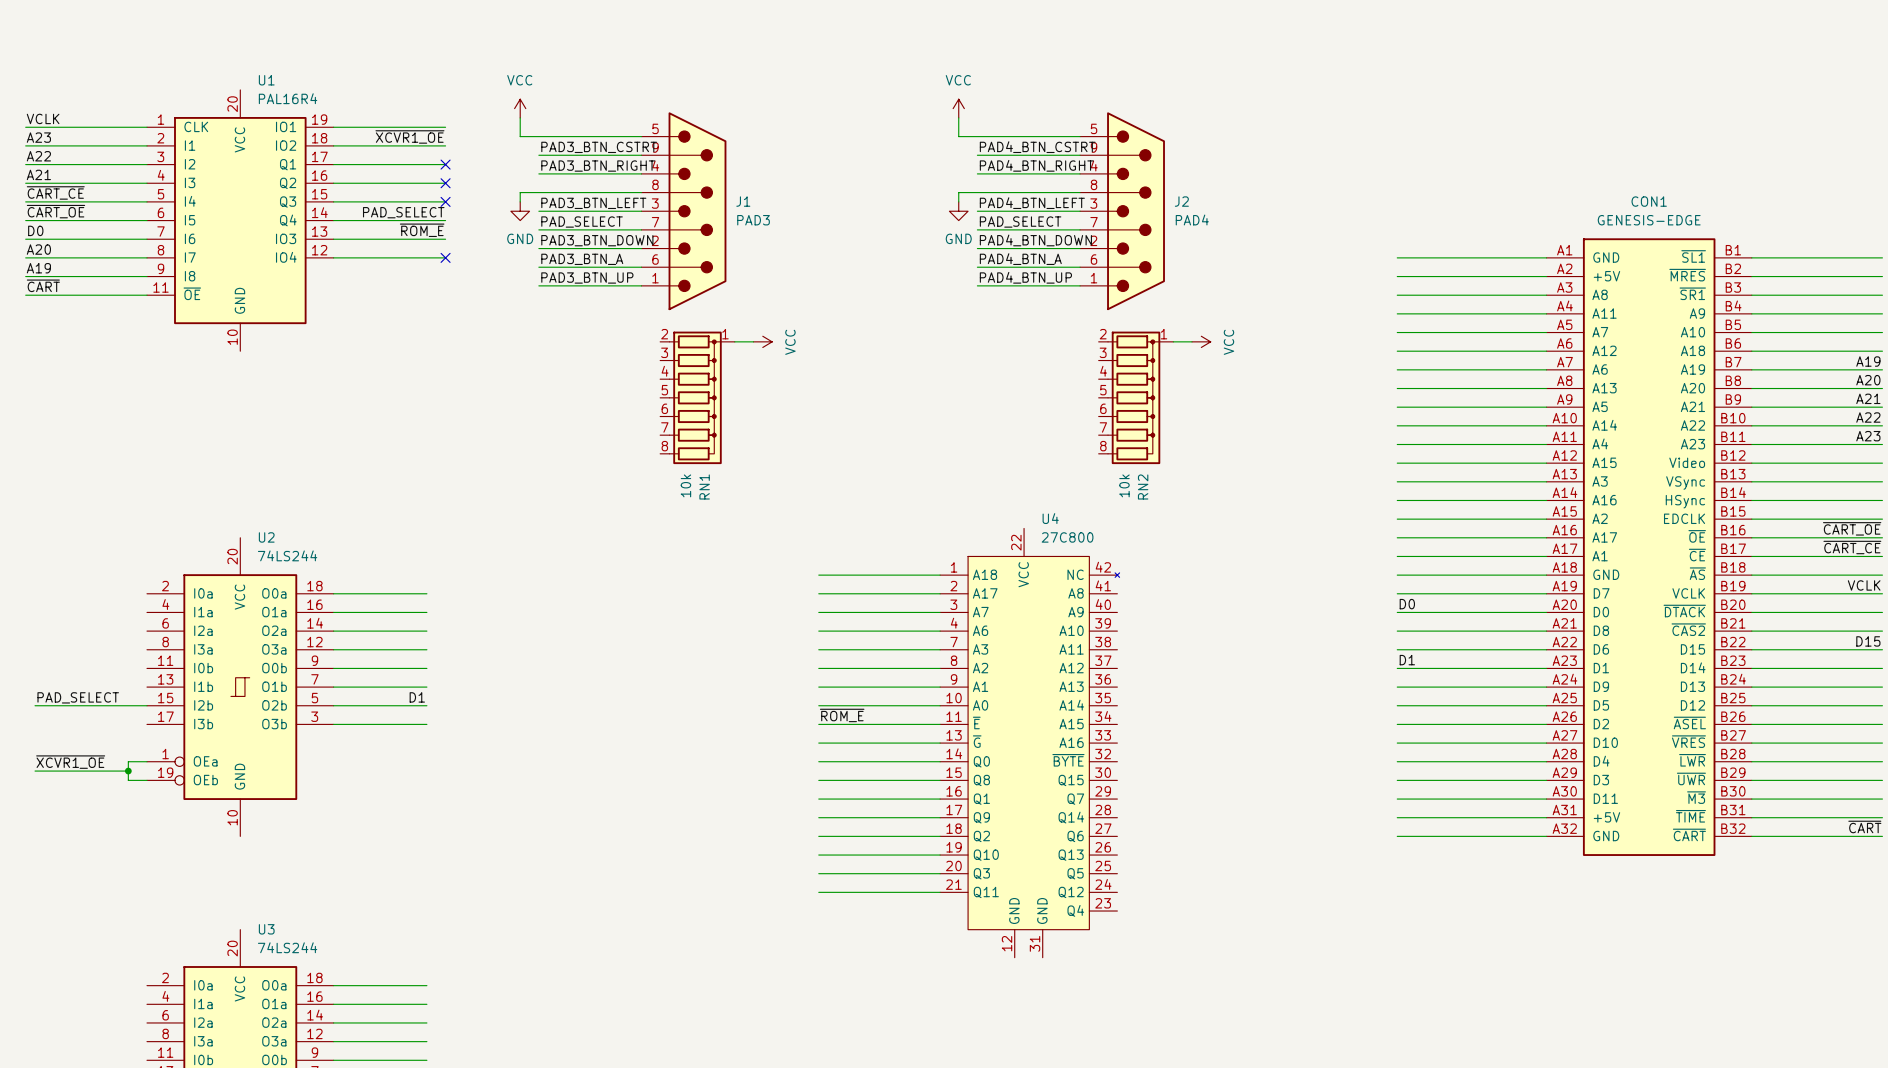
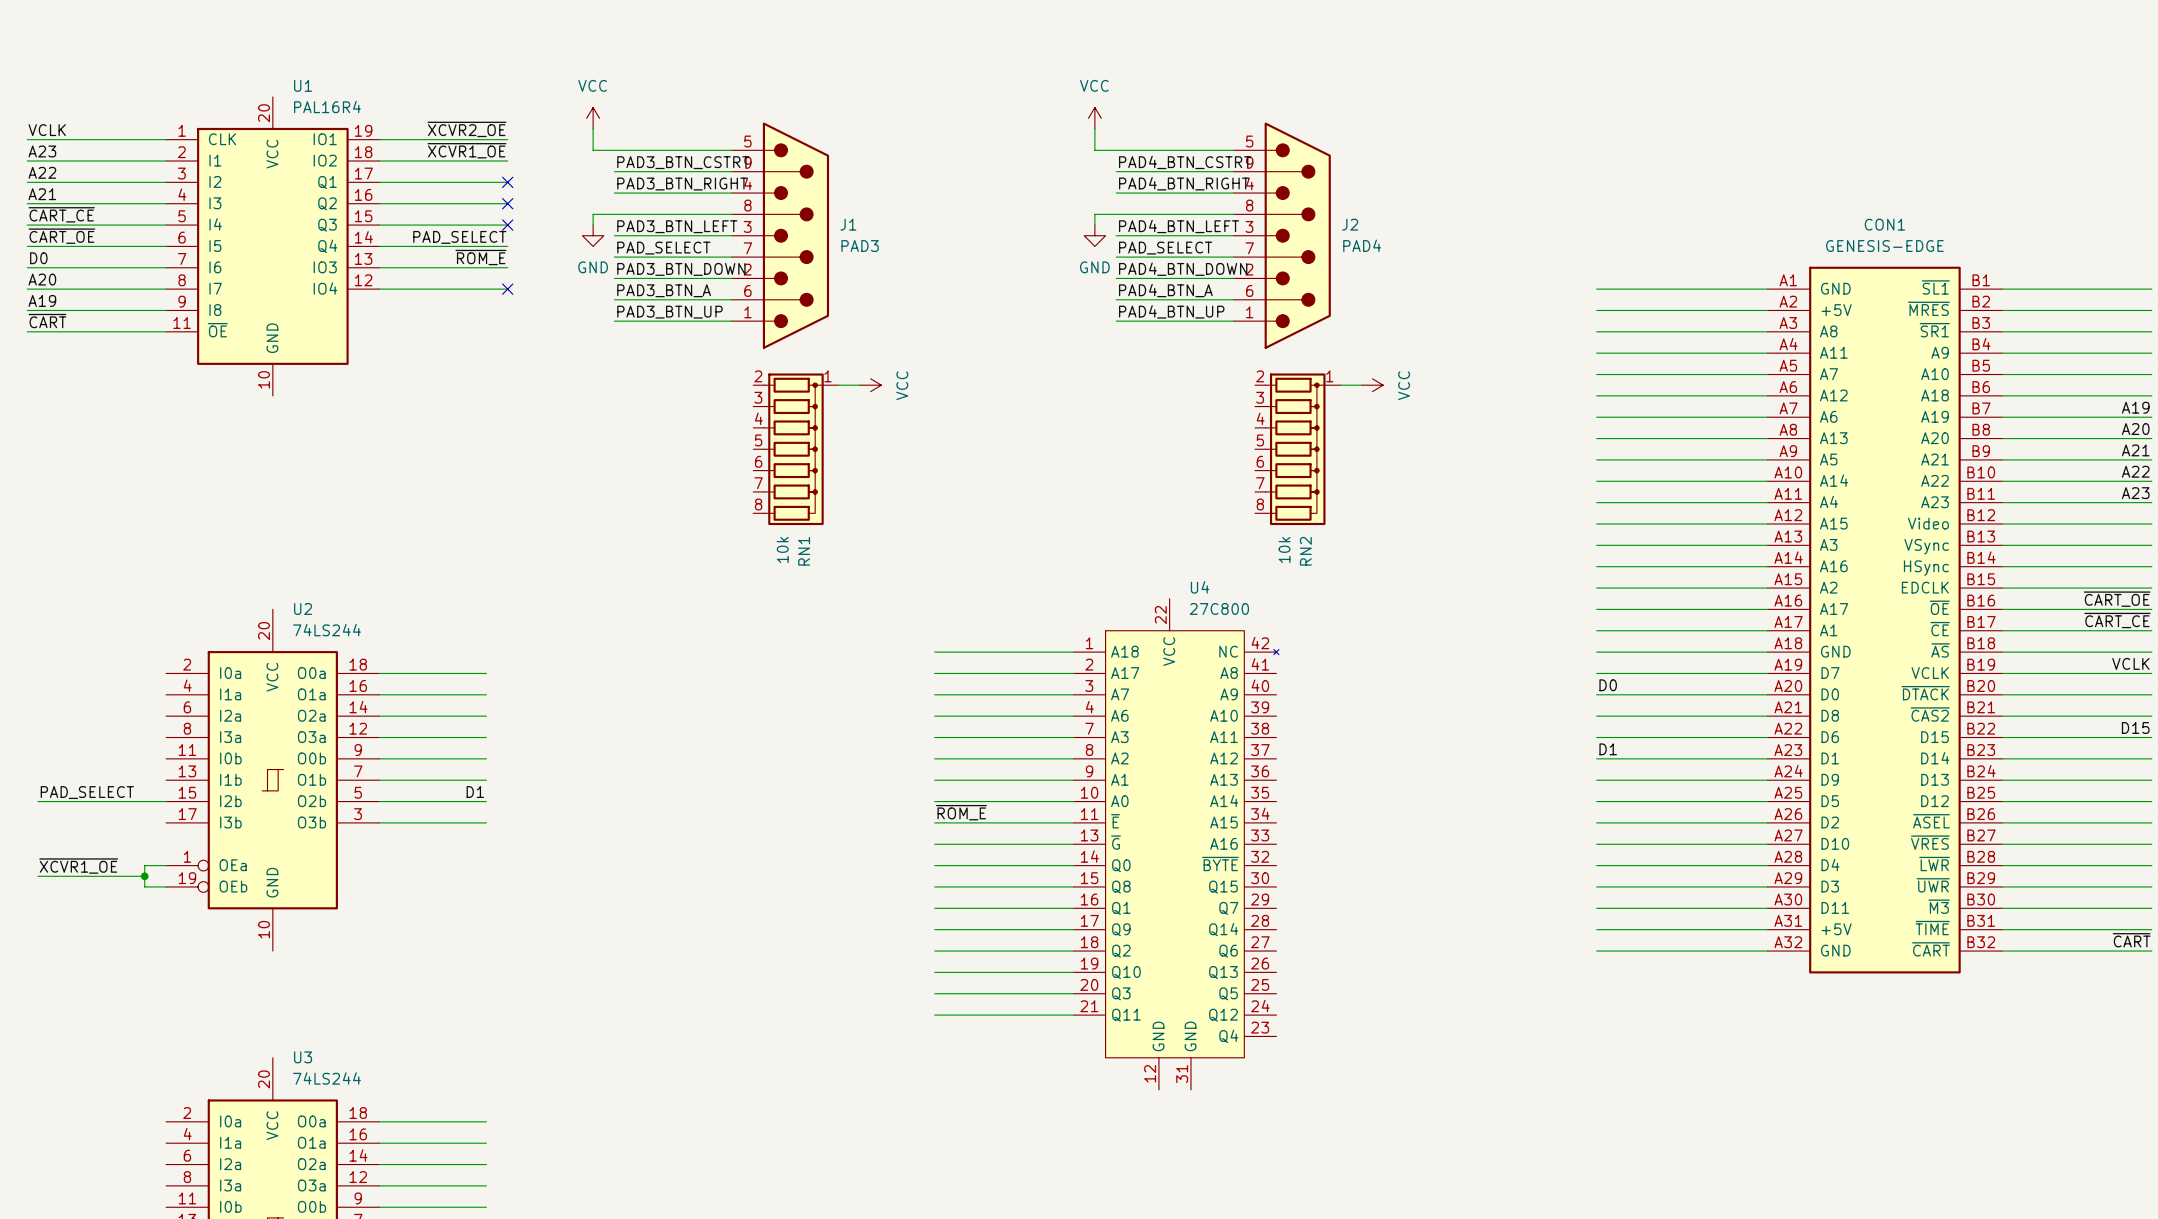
label: none -> ~{XCVR2_OE} (466, 129)

